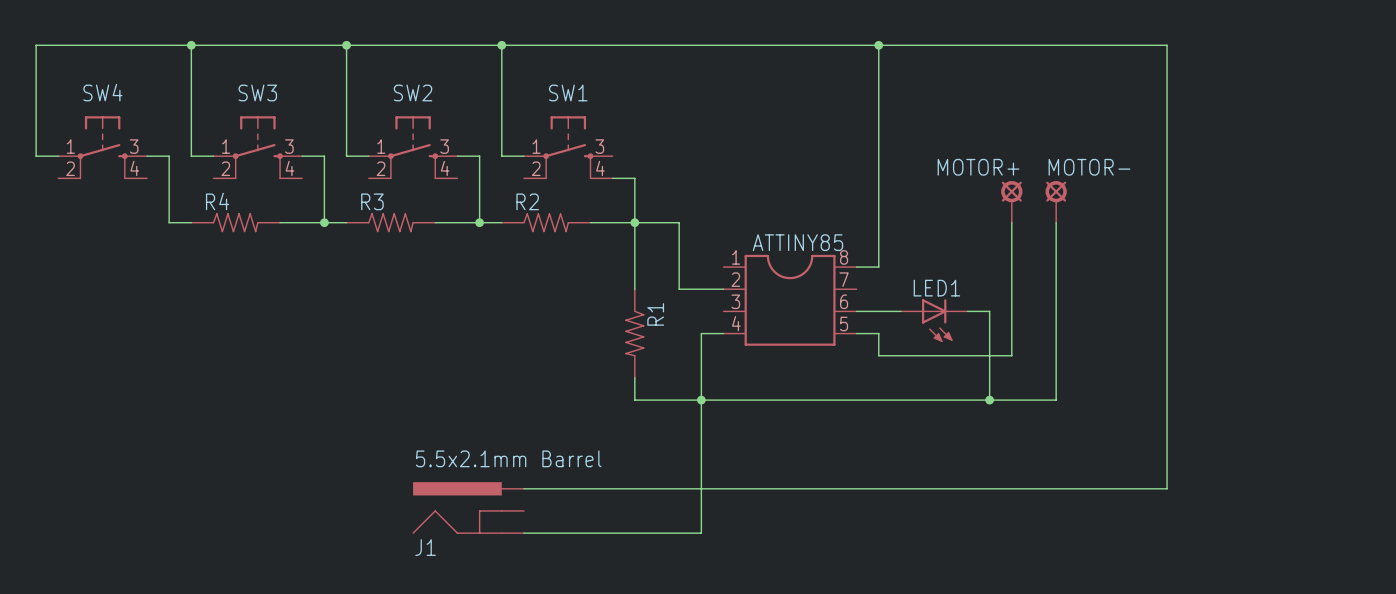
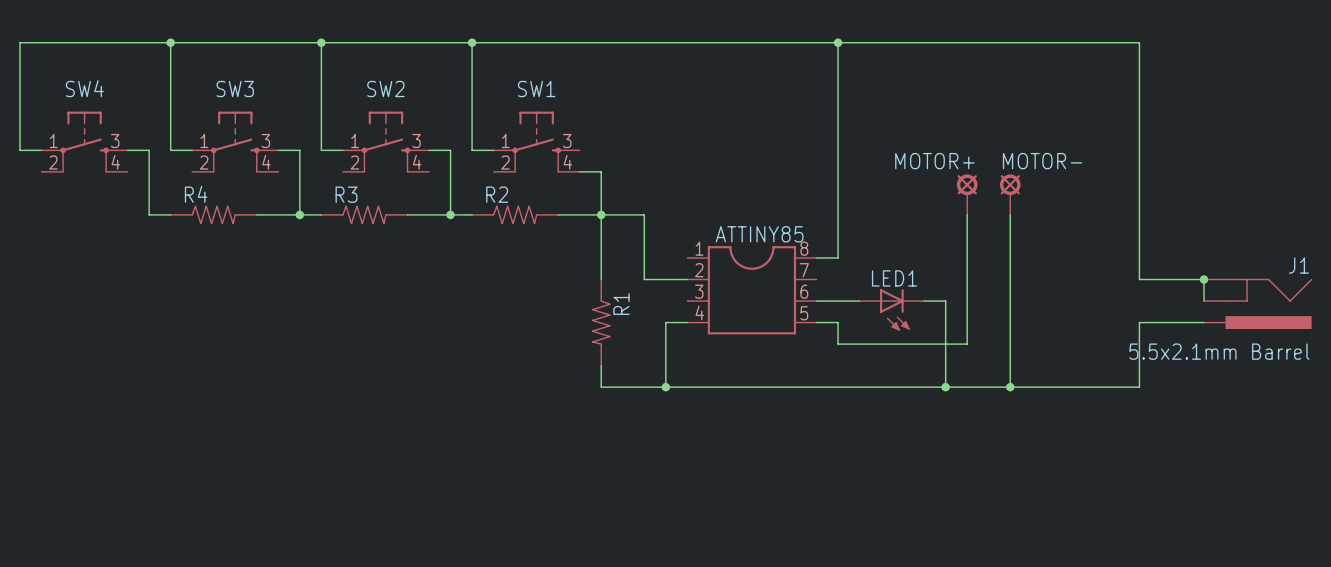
wire: (1167, 45) (1167, 488) (523, 488) -> (1117, 42) (1139, 42) (1139, 279) (1204, 279) (1204, 301)
junction: none -> (1204, 279)
wire: none -> (1204, 322) (1139, 322) (1139, 387) (1010, 387)
wire: (701, 400) (701, 533) (523, 533) -> none
junction: none -> (1010, 387)
J1 rotation: 0° (457, 507) -> 180° (1268, 303)
J1 position: (468, 507) -> (1258, 303)

